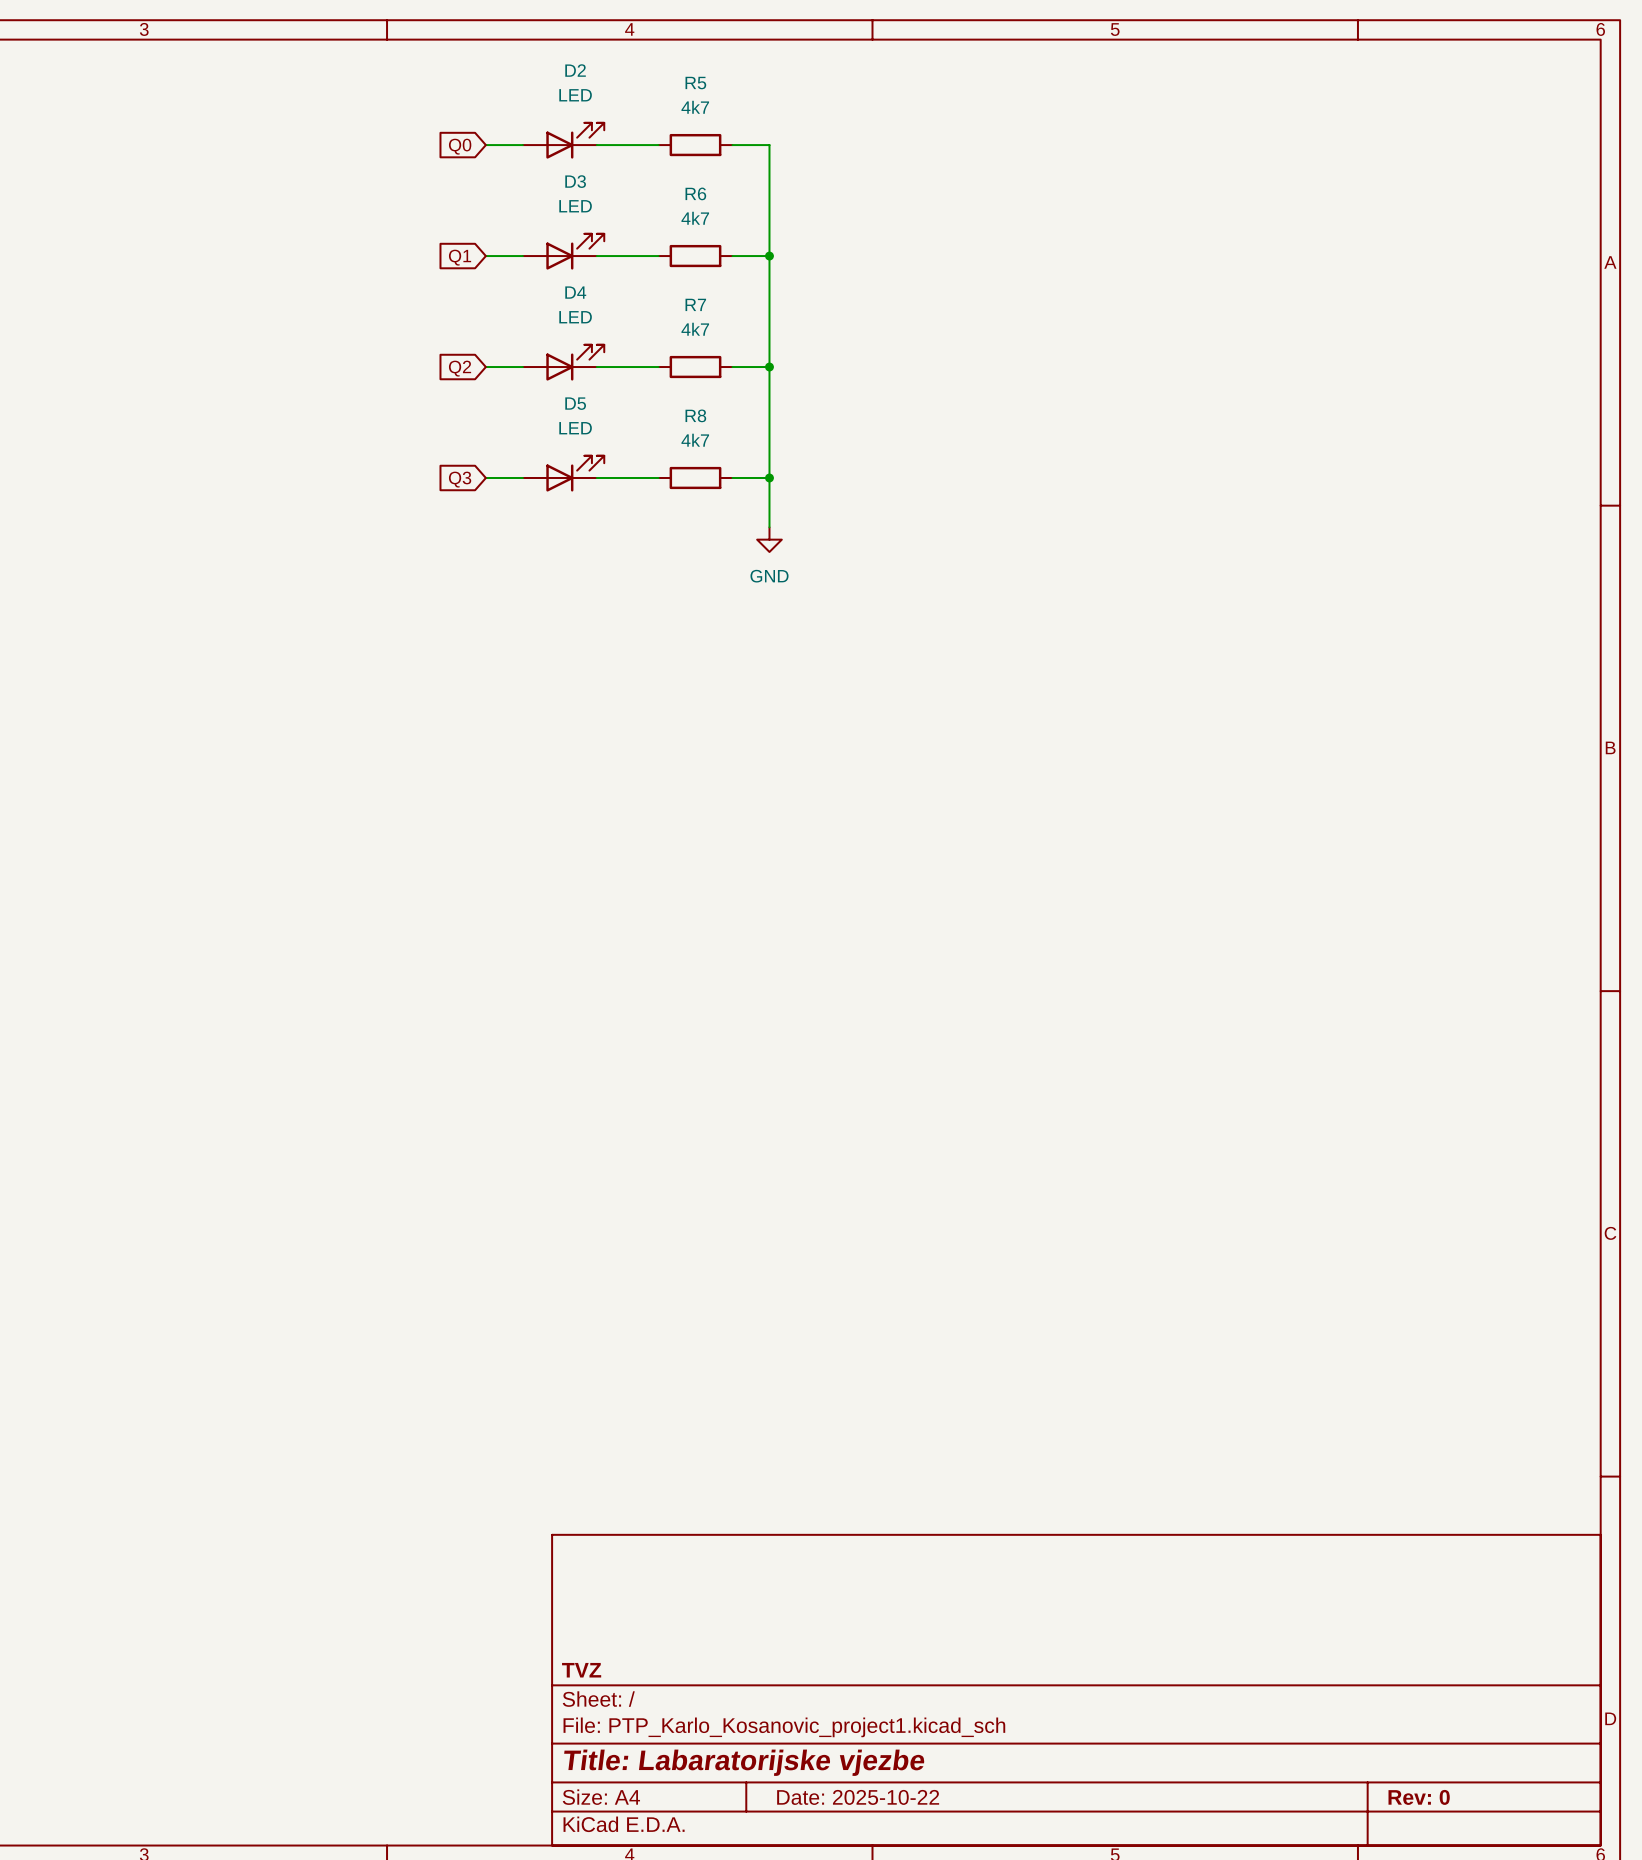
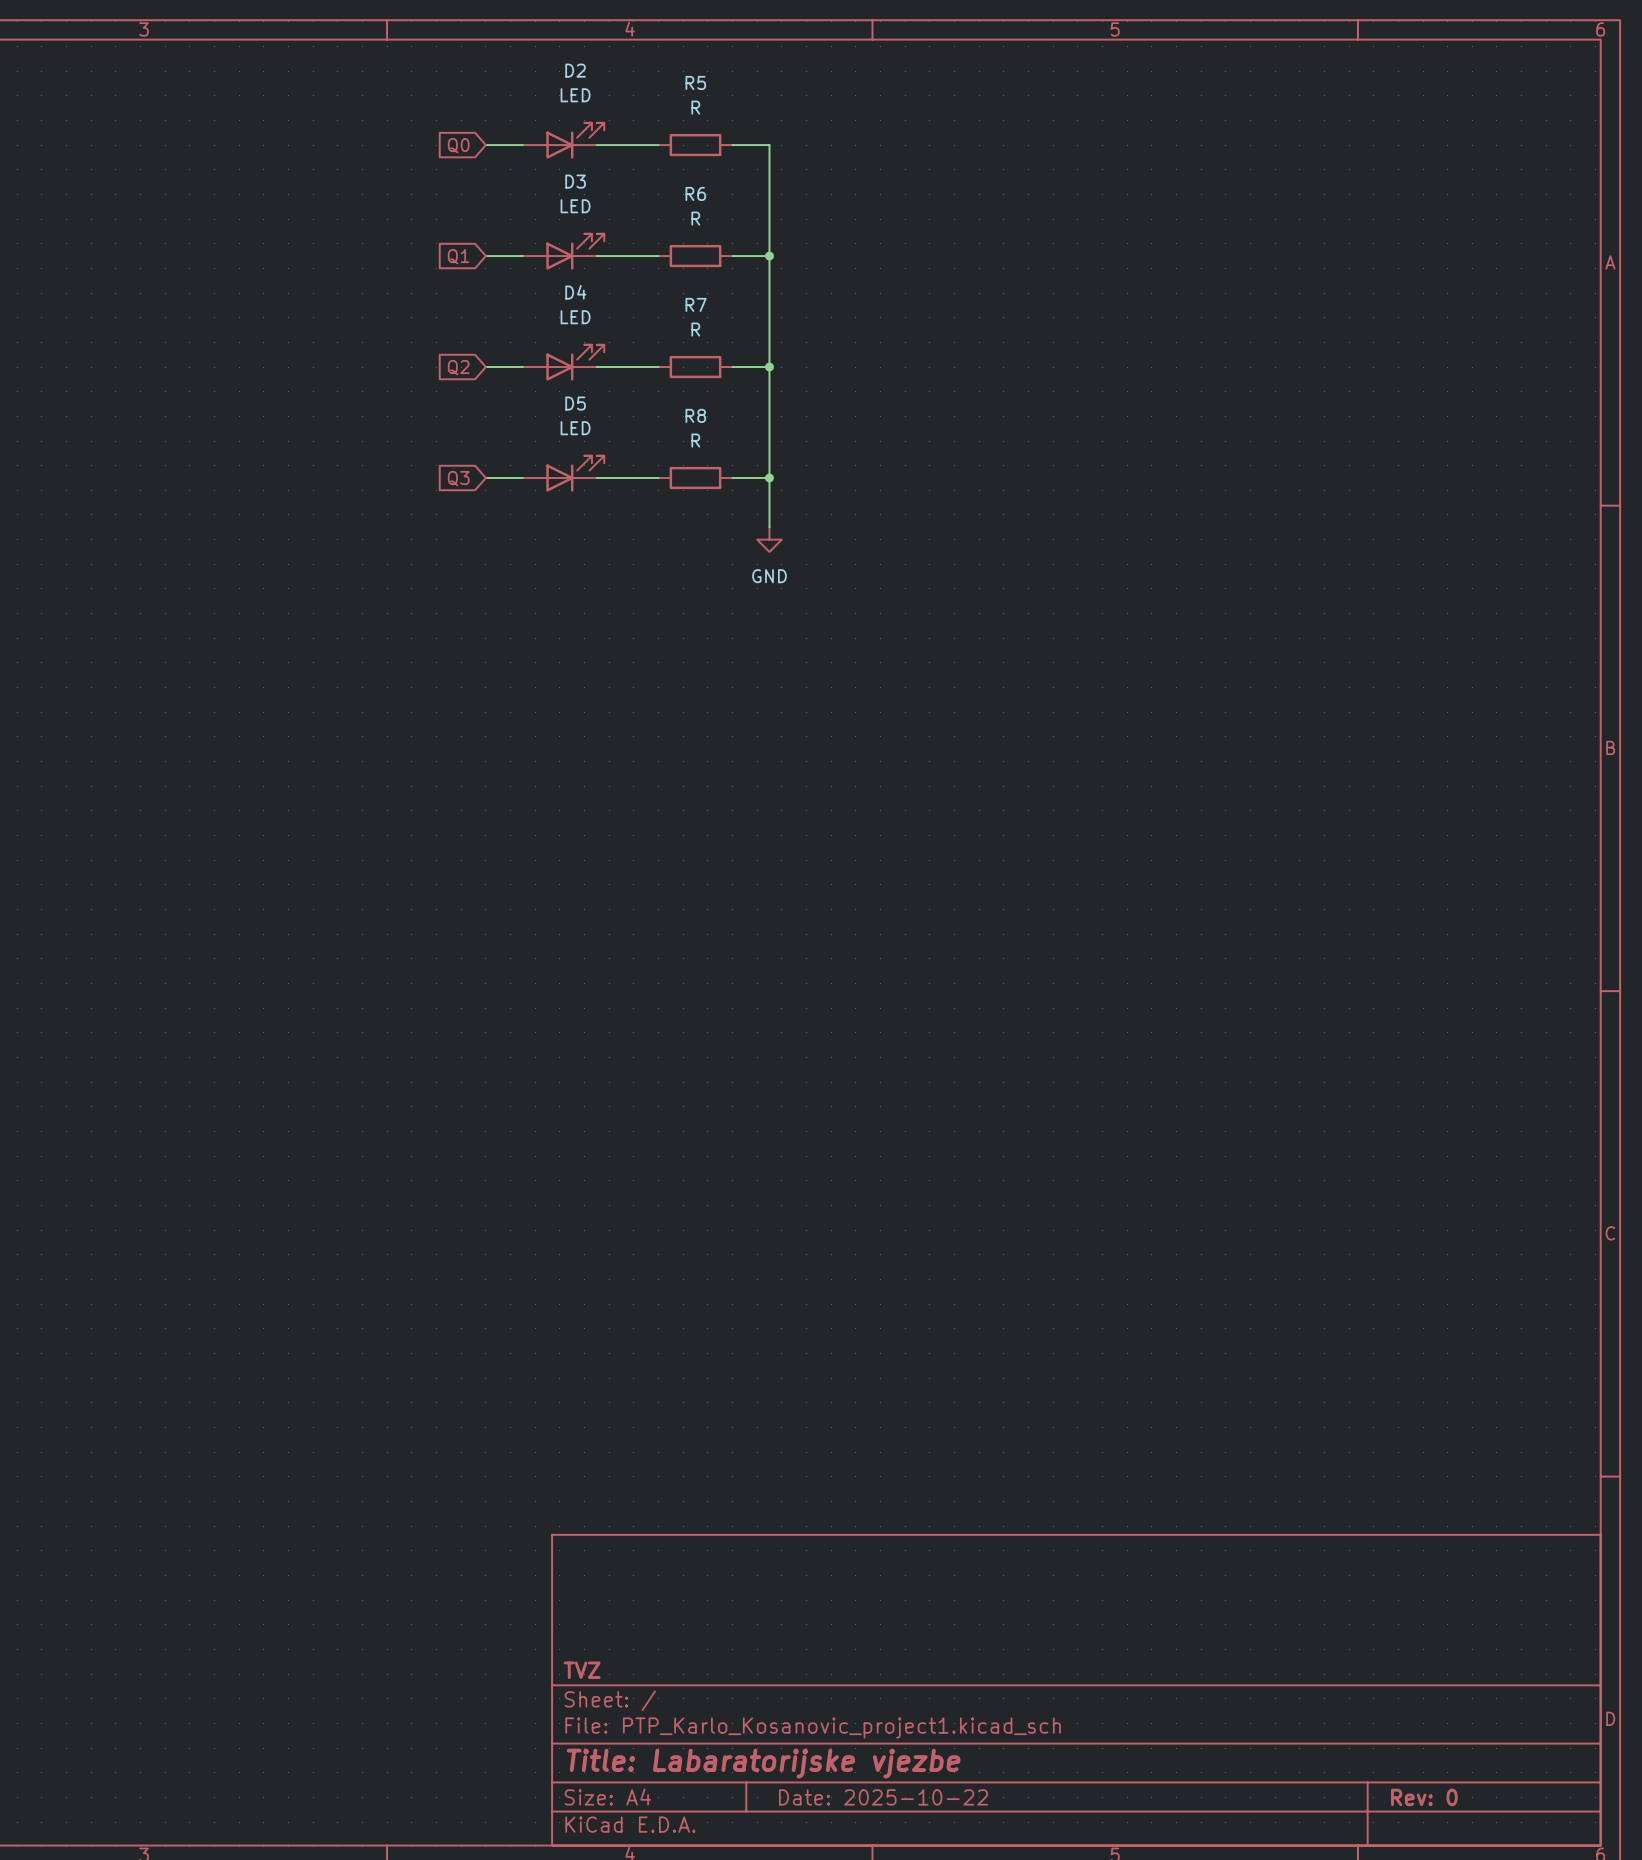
R5 value: 4k7 (695, 107) -> R (695, 107)
R6 value: 4k7 (695, 218) -> R (695, 218)
R7 value: 4k7 (695, 329) -> R (695, 329)
R8 value: 4k7 (695, 440) -> R (695, 440)

